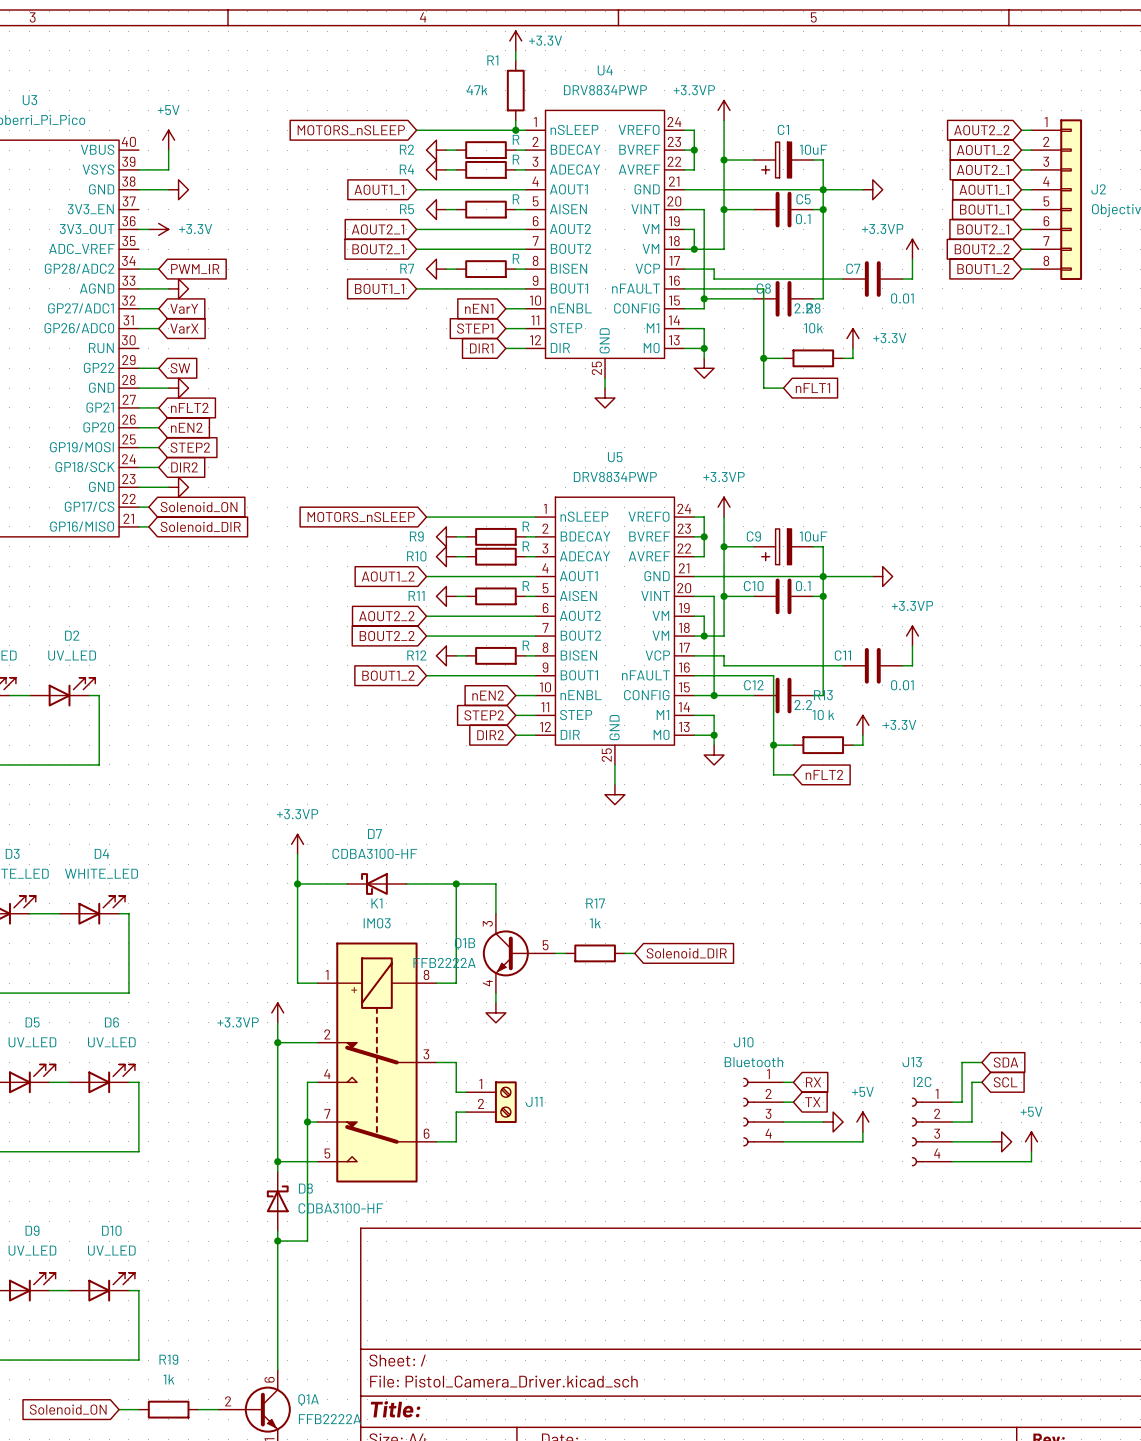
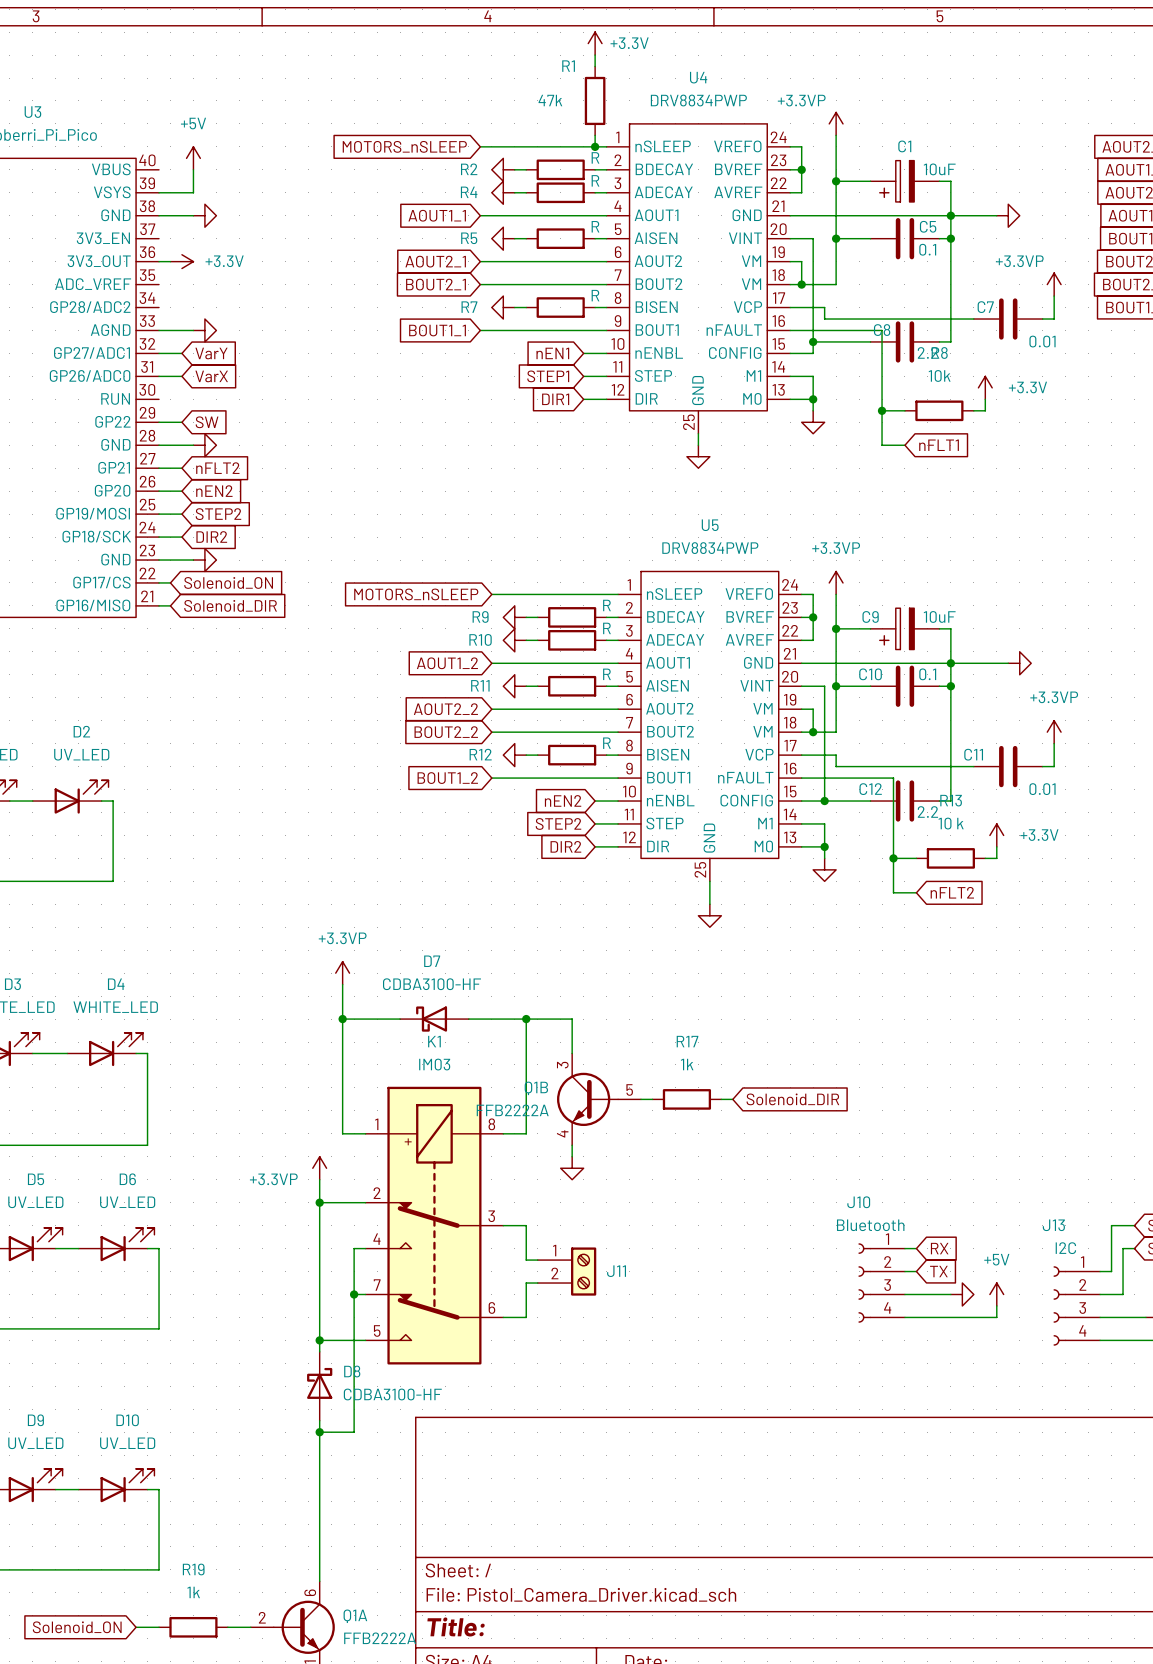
wire: (138, 269) (158, 269) -> none
global label: PWM_IR (195, 269) -> none

